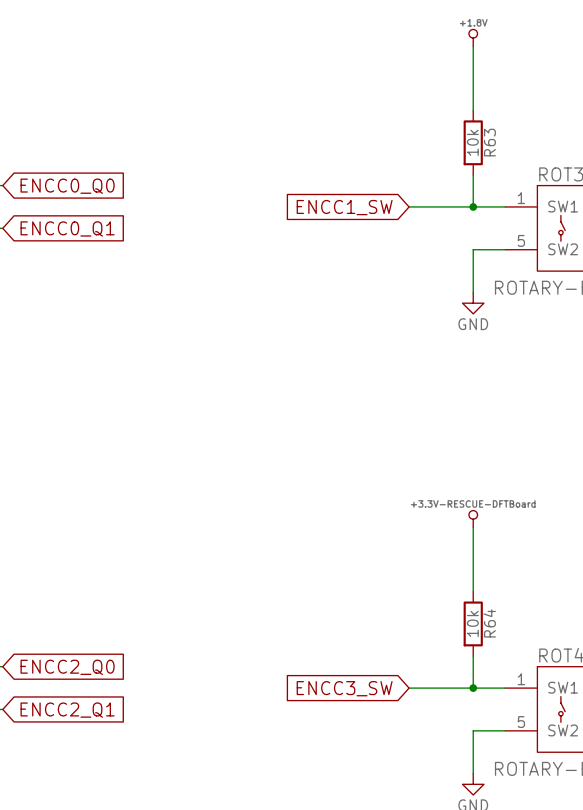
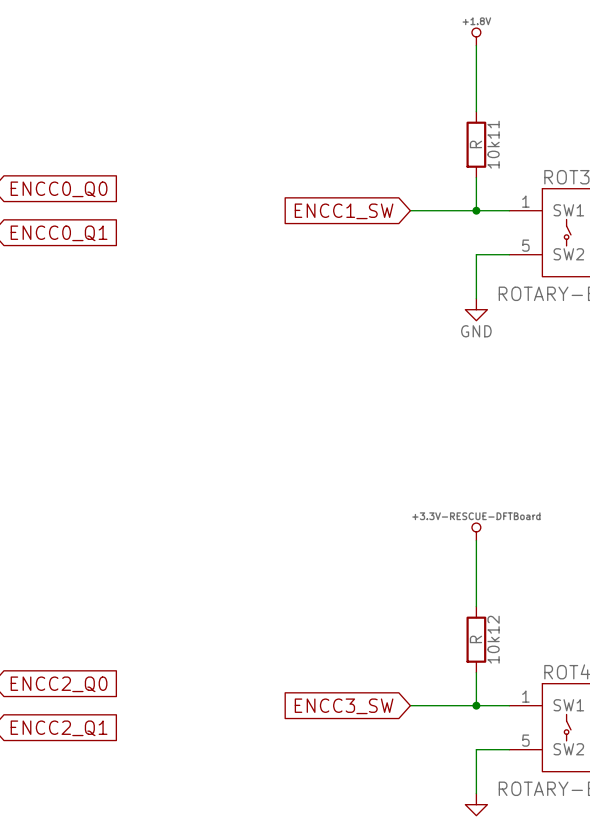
R63 value: 10k (472, 142) -> R (475, 144)
R63 name: R63 (489, 142) -> 10k11 (493, 144)
R64 value: 10k (472, 623) -> R (475, 639)
R64 name: R64 (489, 623) -> 10k12 (493, 639)

